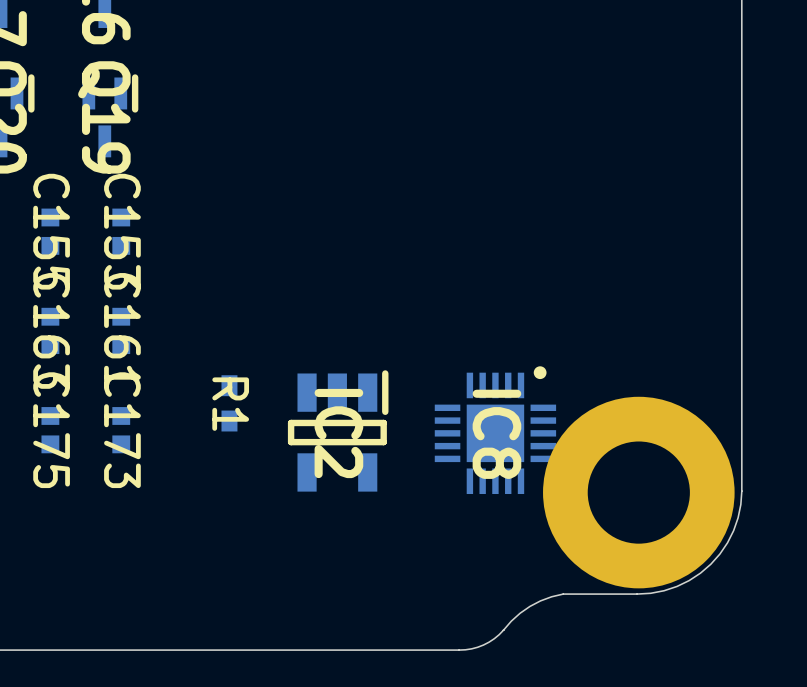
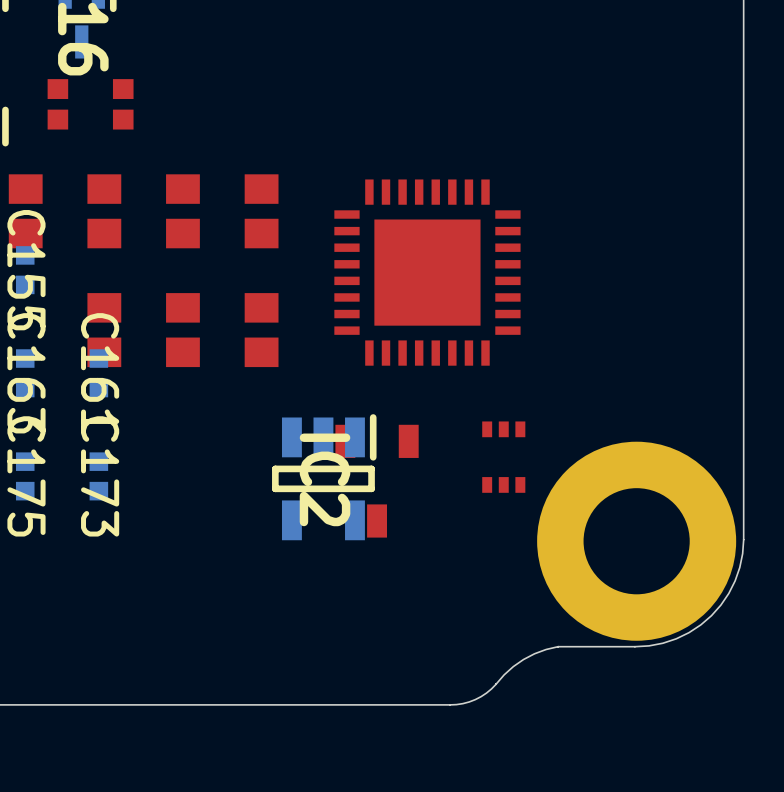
part: none -> (57, 104)
part: none -> (123, 104)
Q19: (110, 115) -> none
part: none -> (25, 211)
part: none -> (104, 211)
part: none -> (182, 211)
part: none -> (261, 211)
C153: (121, 231) -> none
part: none -> (427, 272)
part: none -> (104, 330)
part: none -> (182, 330)
part: none -> (261, 330)
R1: (229, 403) -> none
part: none -> (503, 457)
IC8: (495, 430) -> none
part: none -> (377, 481)

